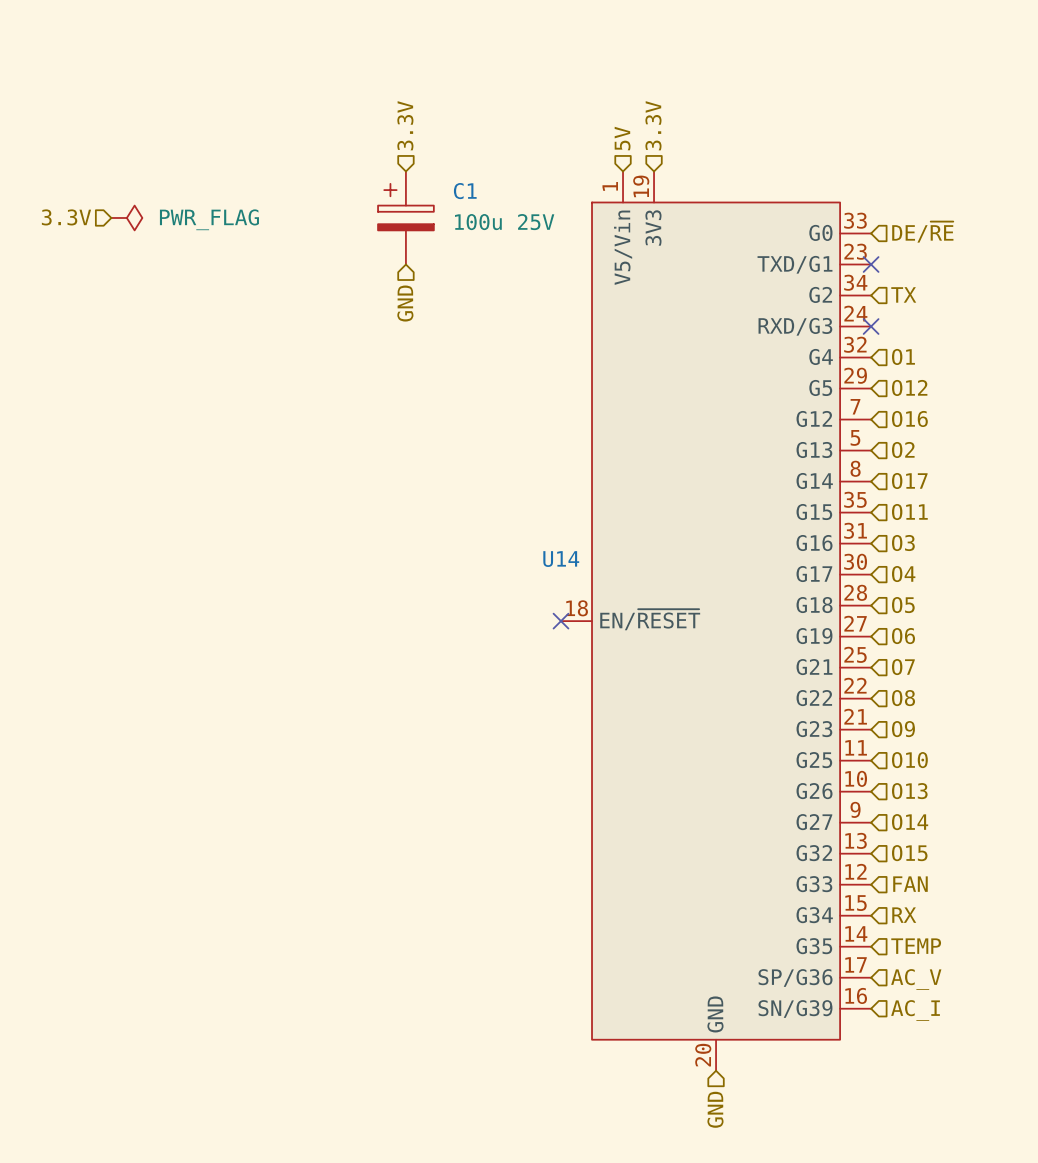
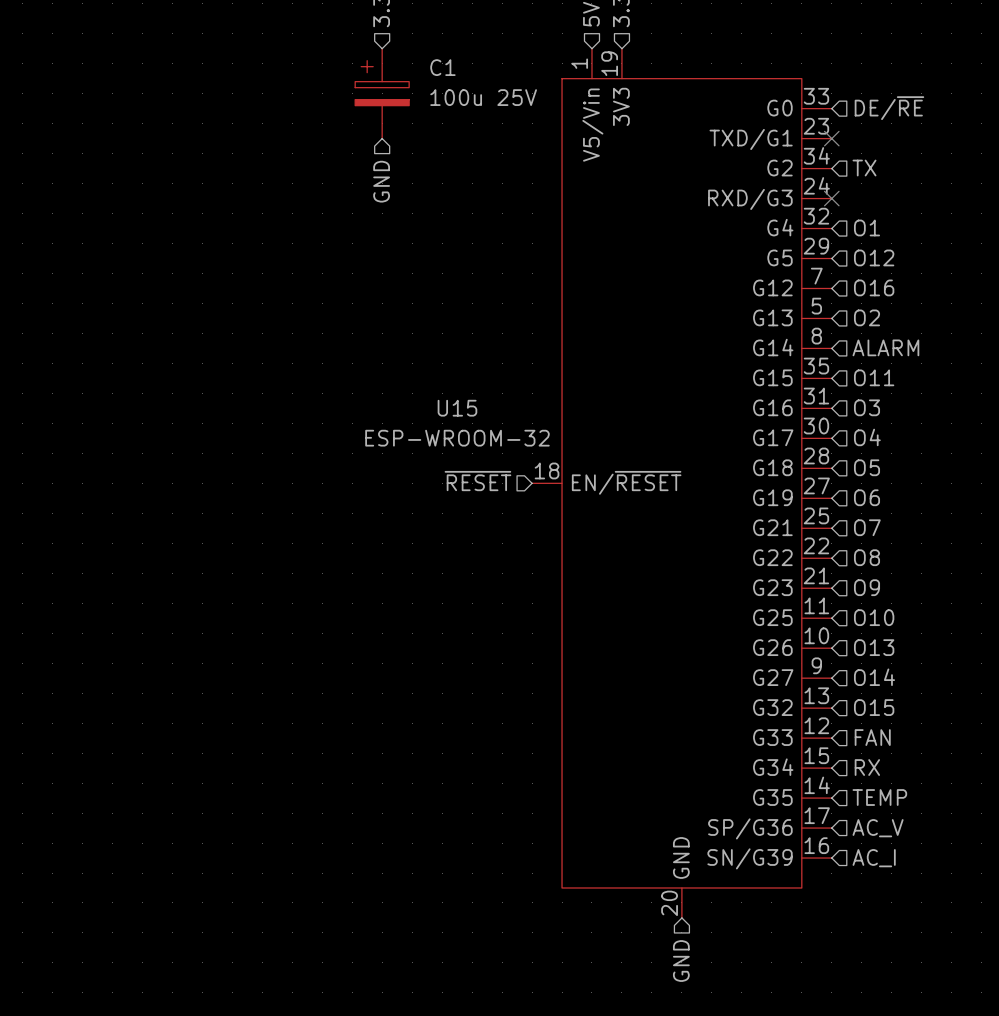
hierarchical label: 3.3V (66, 217) -> none
power symbol: PWR_FLAG (126, 217) -> none
hierarchical label: O17 (909, 481) -> ALARM (885, 347)
U14 name: U14 (561, 559) -> U15 (457, 408)
U14 value: none -> ESP-WROOM-32 (457, 438)
hierarchical label: none -> ~{RESET} (477, 481)
no-connect mark: (561, 621) -> none

